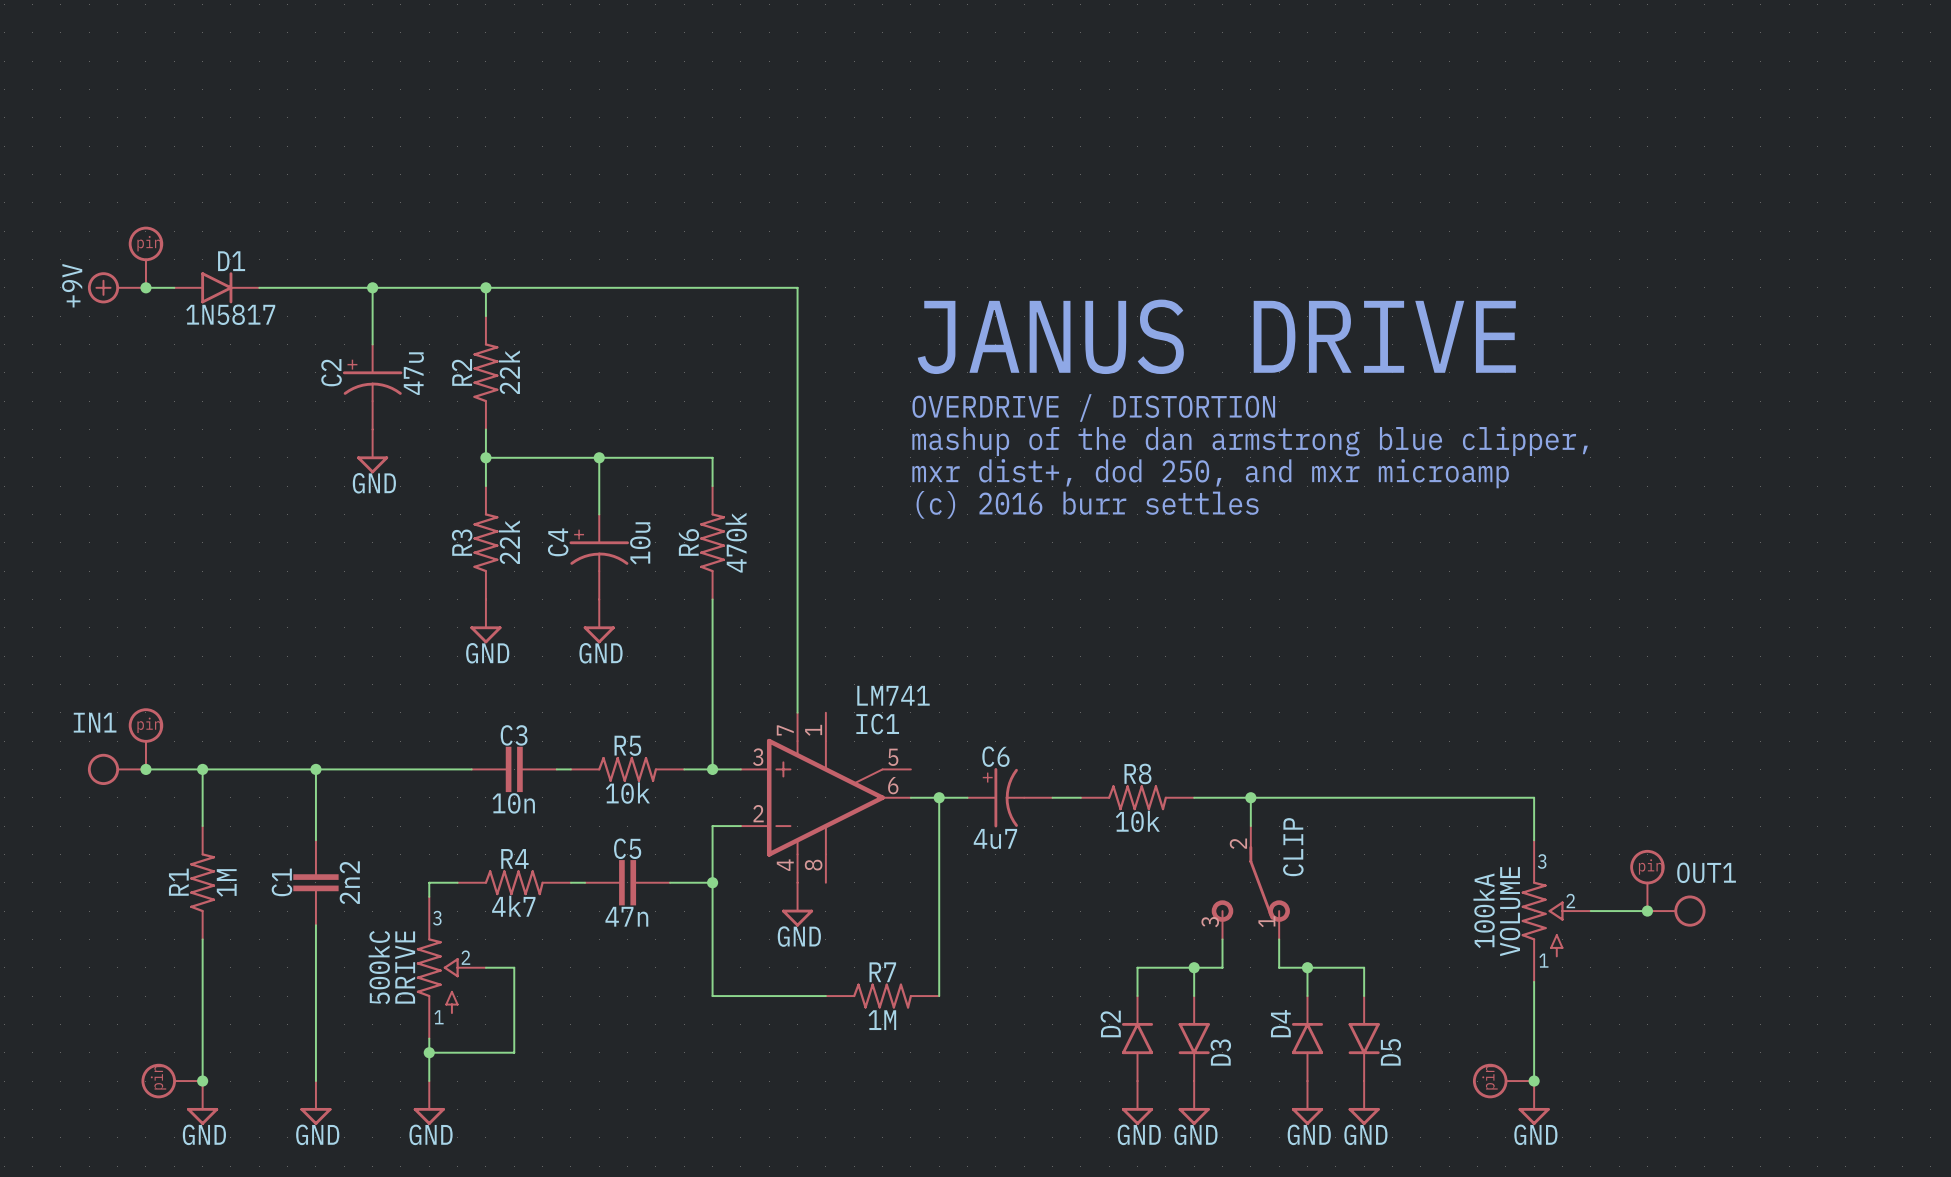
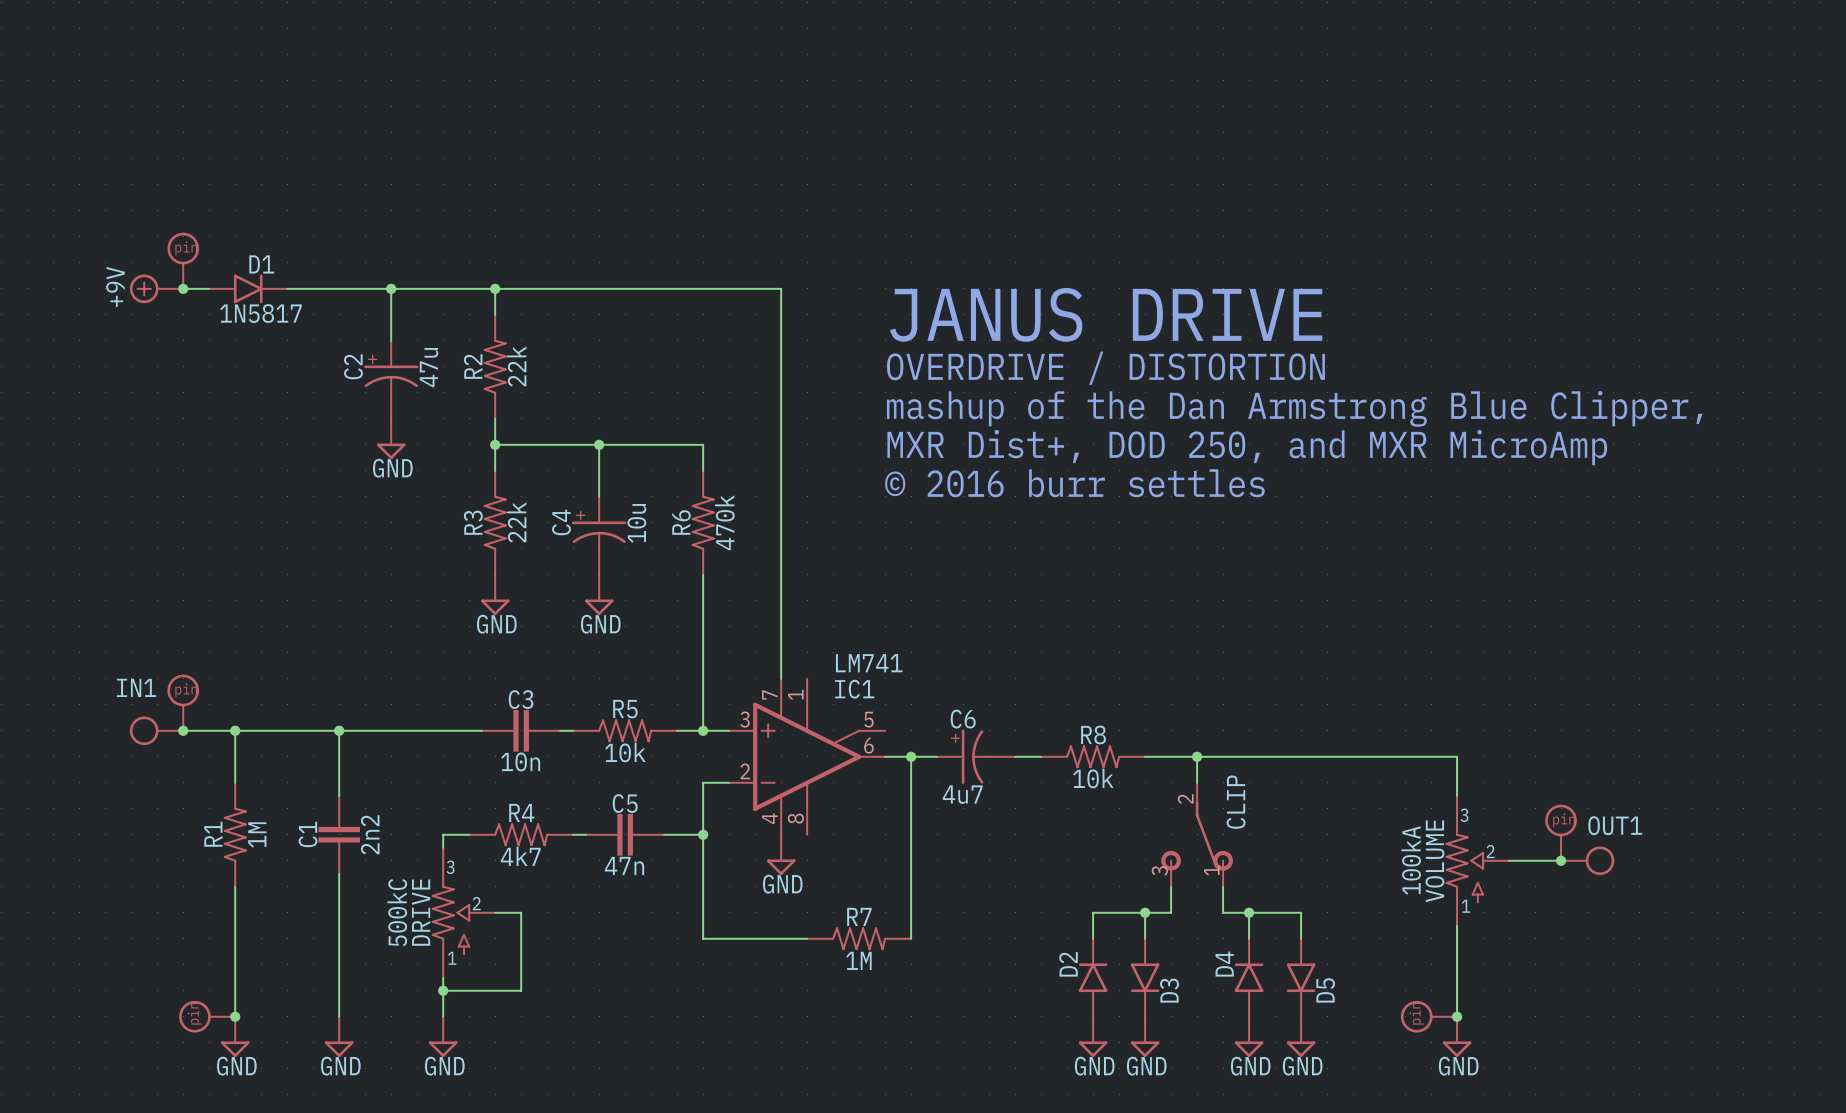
text: none -> JANUS DRIVE (1106, 314)
text: JANUS DRIVE (1216, 336) -> OVERDRIVE / DISTORTION (1105, 368)
text: OVERDRIVE / DISTORTION (1093, 407) -> none
text: mashup of the dan armstrong blue clipper, (1250, 441) -> mashup of the Dan Armstrong Blue Clipper, (1294, 408)
text: mxr dist+, dod 250, and mxr microamp (1210, 473) -> MXR Dist+, DOD 250, and MXR MicroAmp (1247, 447)
text: (c) 2016 burr settles (1087, 504) -> © 2016 burr settles (1074, 483)

